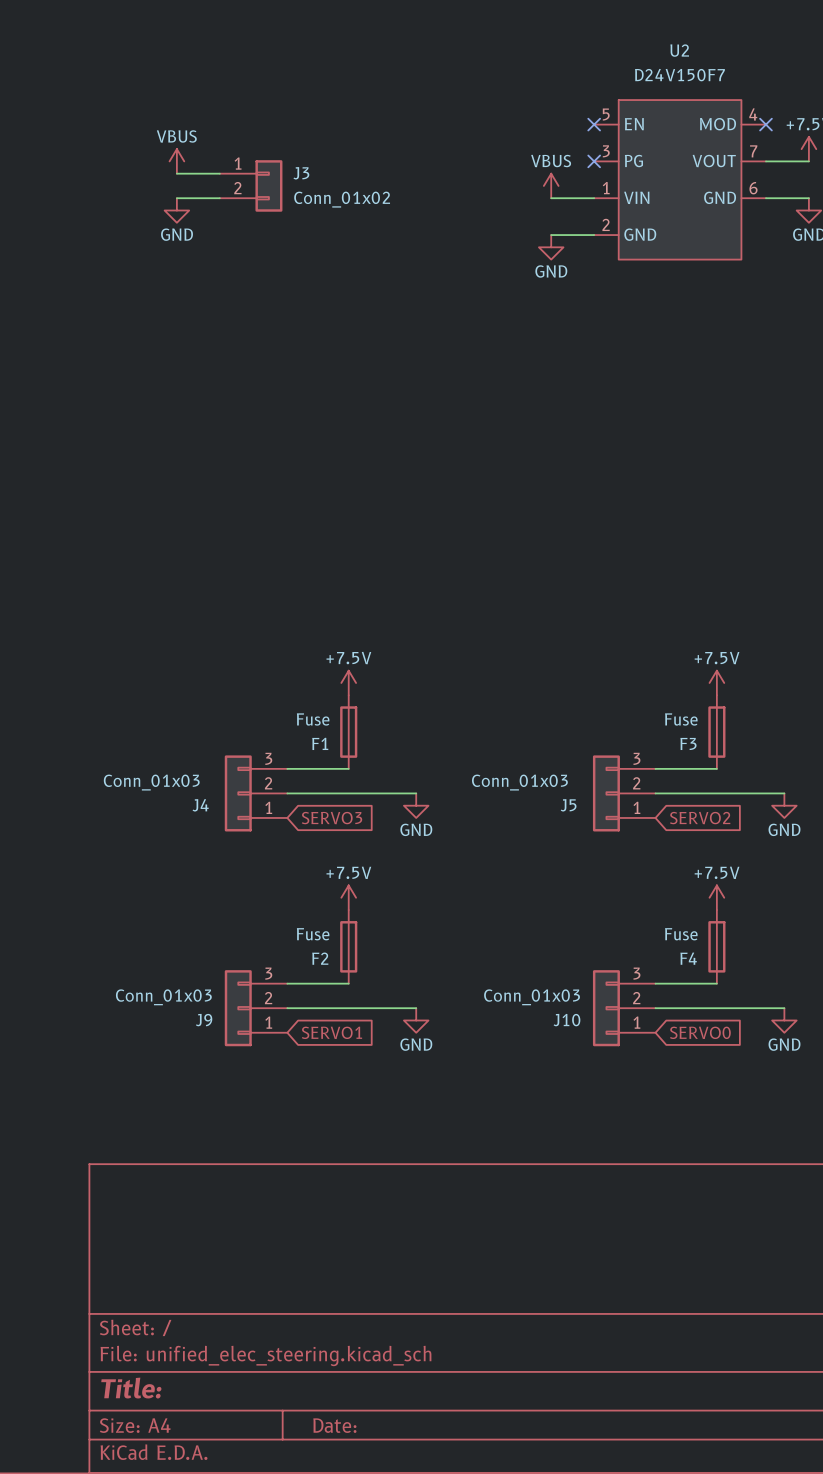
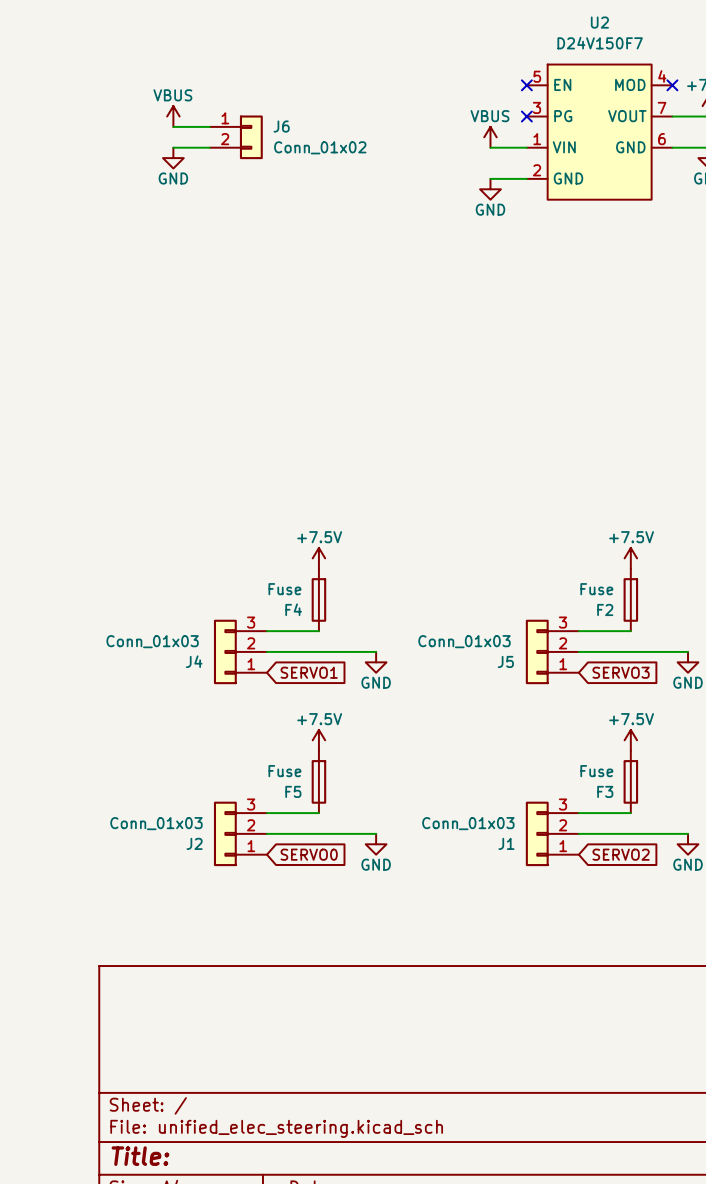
J3 name: J3 (301, 173) -> J6 (281, 126)
F1 name: F1 (320, 743) -> F4 (293, 609)
F3 name: F3 (688, 743) -> F2 (605, 609)
global label: SERVO3 (332, 818) -> SERVO1 (309, 672)
global label: SERVO2 (700, 818) -> SERVO3 (621, 672)
F2 name: F2 (320, 958) -> F5 (293, 791)
F4 name: F4 (688, 958) -> F3 (605, 791)
J9 name: J9 (204, 1020) -> J2 (194, 843)
J10 name: J10 (566, 1020) -> J1 (506, 843)
global label: SERVO1 (331, 1032) -> SERVO0 (309, 854)
global label: SERVO0 (700, 1032) -> SERVO2 (621, 854)

